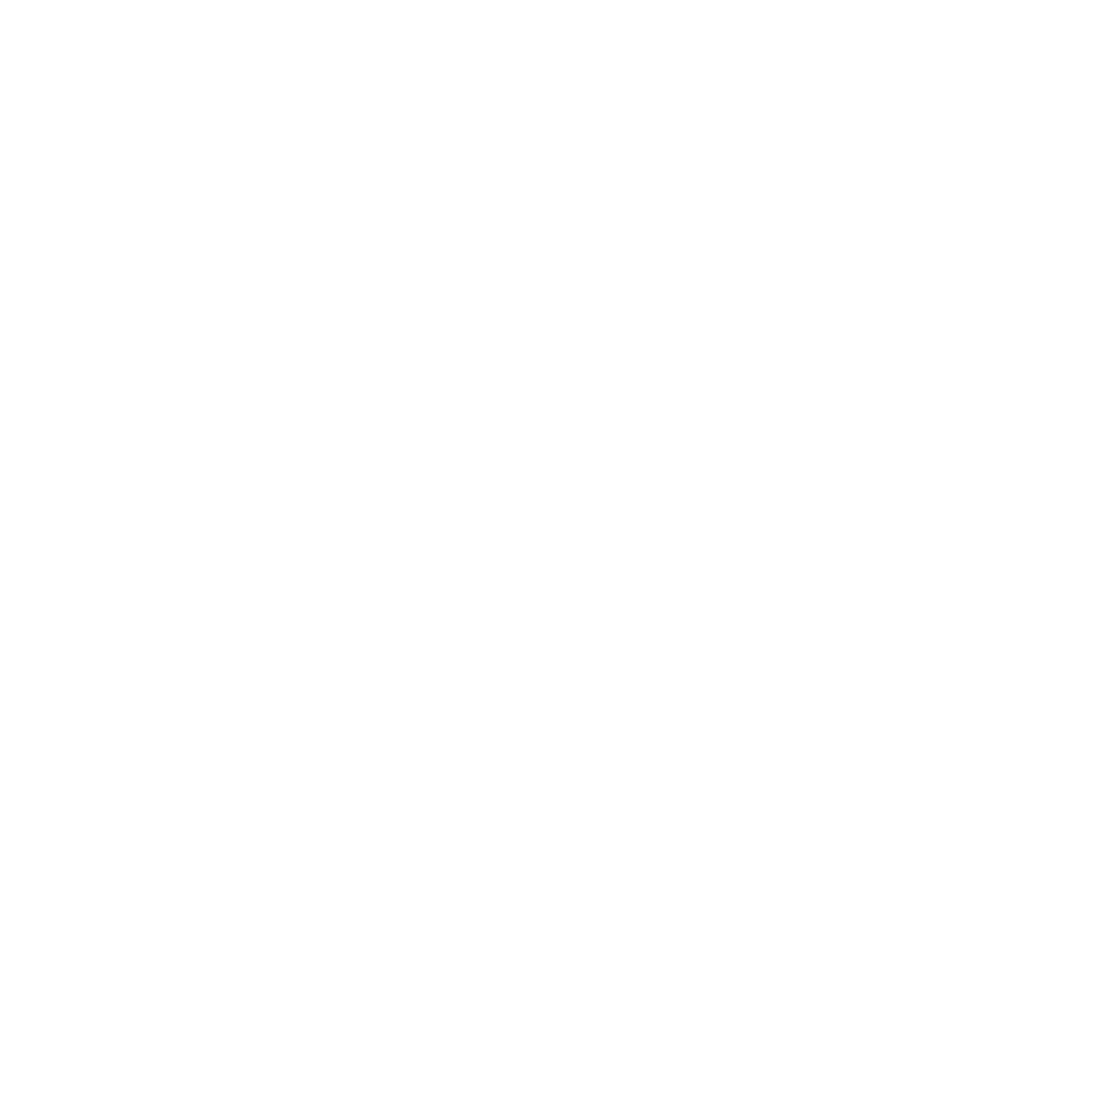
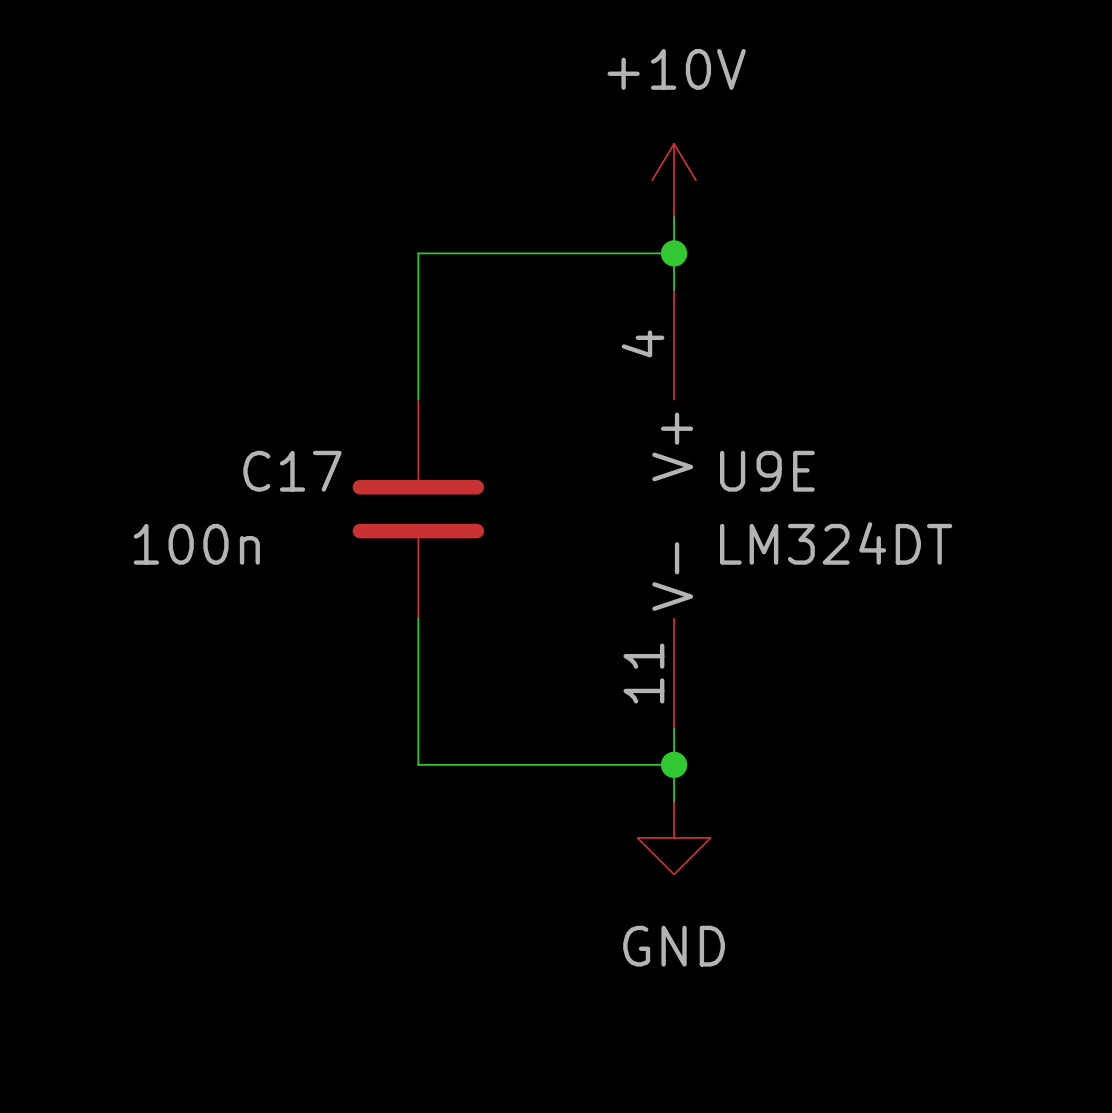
power symbol: none -> +10V (674, 180)
wire: none -> (674, 216) (674, 289)
wire: none -> (674, 253) (418, 253) (418, 399)
junction: none -> (674, 253)
C17: none -> 100n (418, 509)
U9E: none -> LM324DT (674, 509)
wire: none -> (418, 618) (418, 764) (674, 764)
wire: none -> (674, 728) (674, 801)
junction: none -> (674, 764)
power symbol: none -> GND (674, 837)

